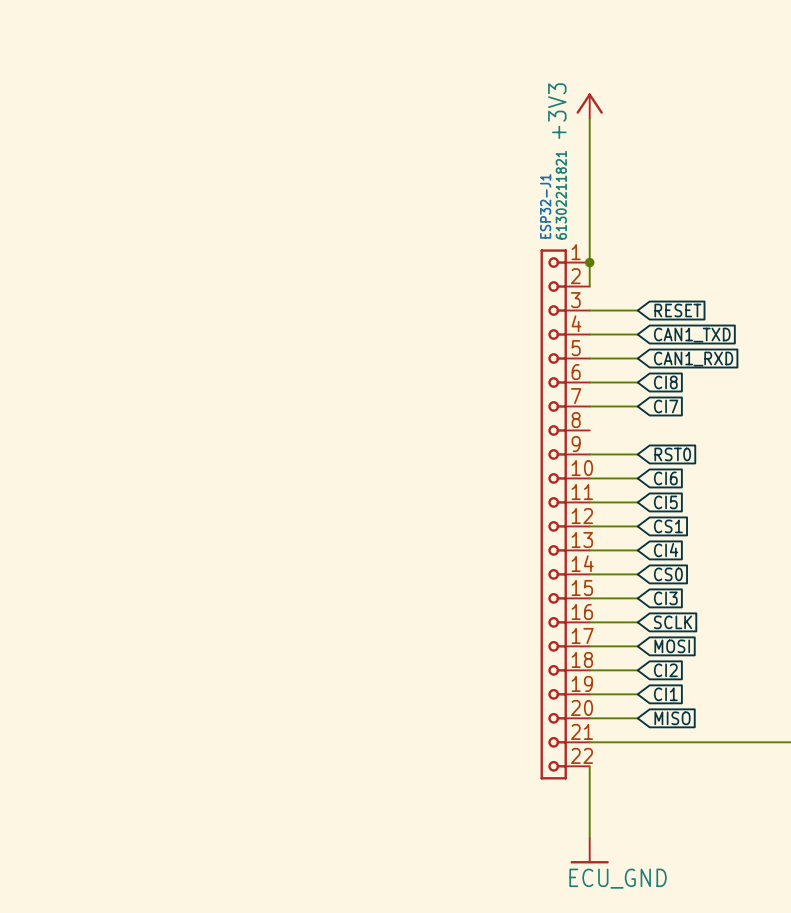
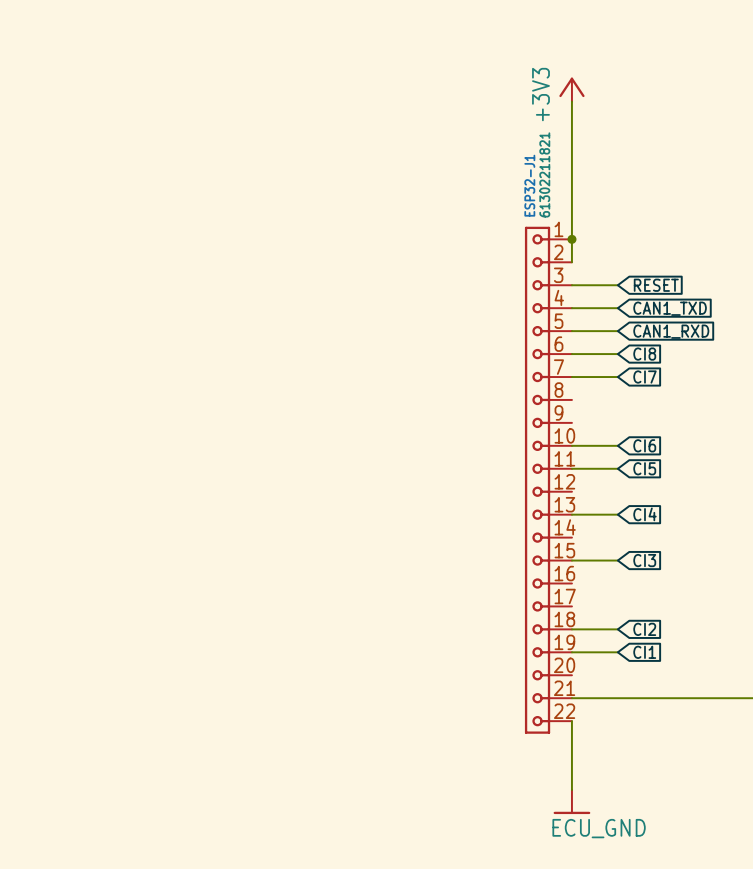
wire: (589, 454) (637, 454) -> none
global label: RST0 (672, 454) -> none
wire: (589, 526) (637, 526) -> none
global label: CS1 (668, 526) -> none
wire: (589, 574) (637, 574) -> none
global label: CS0 (668, 574) -> none
wire: (589, 622) (637, 622) -> none
global label: SCLK (673, 622) -> none
wire: (589, 646) (637, 646) -> none
global label: MOSI (672, 646) -> none
wire: (589, 718) (637, 718) -> none
global label: MISO (672, 718) -> none

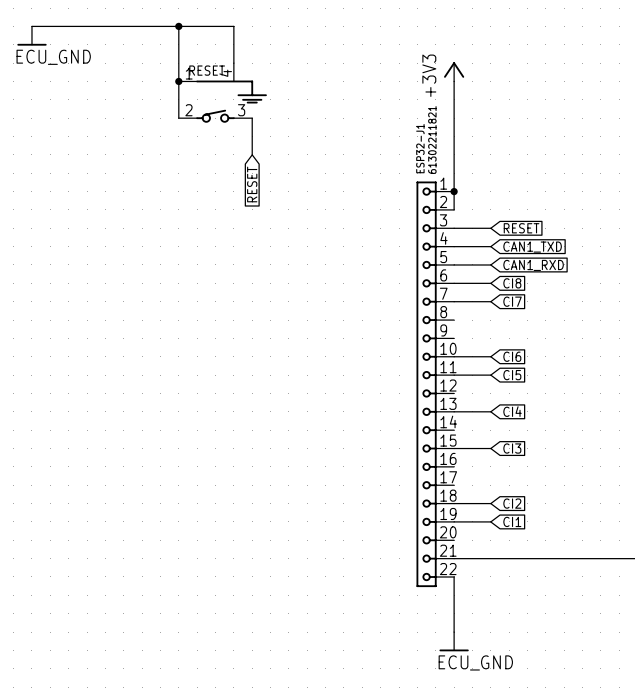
wire: none -> (31, 26) (233, 26) (233, 63)
wire: none -> (178, 26) (178, 118)
junction: none -> (178, 26)
power symbol: none -> ECU_GND (31, 36)
junction: none -> (178, 81)
RESET: none -> (222, 92)
wire: none -> (252, 118) (252, 154)
global label: none -> RESET (252, 184)

